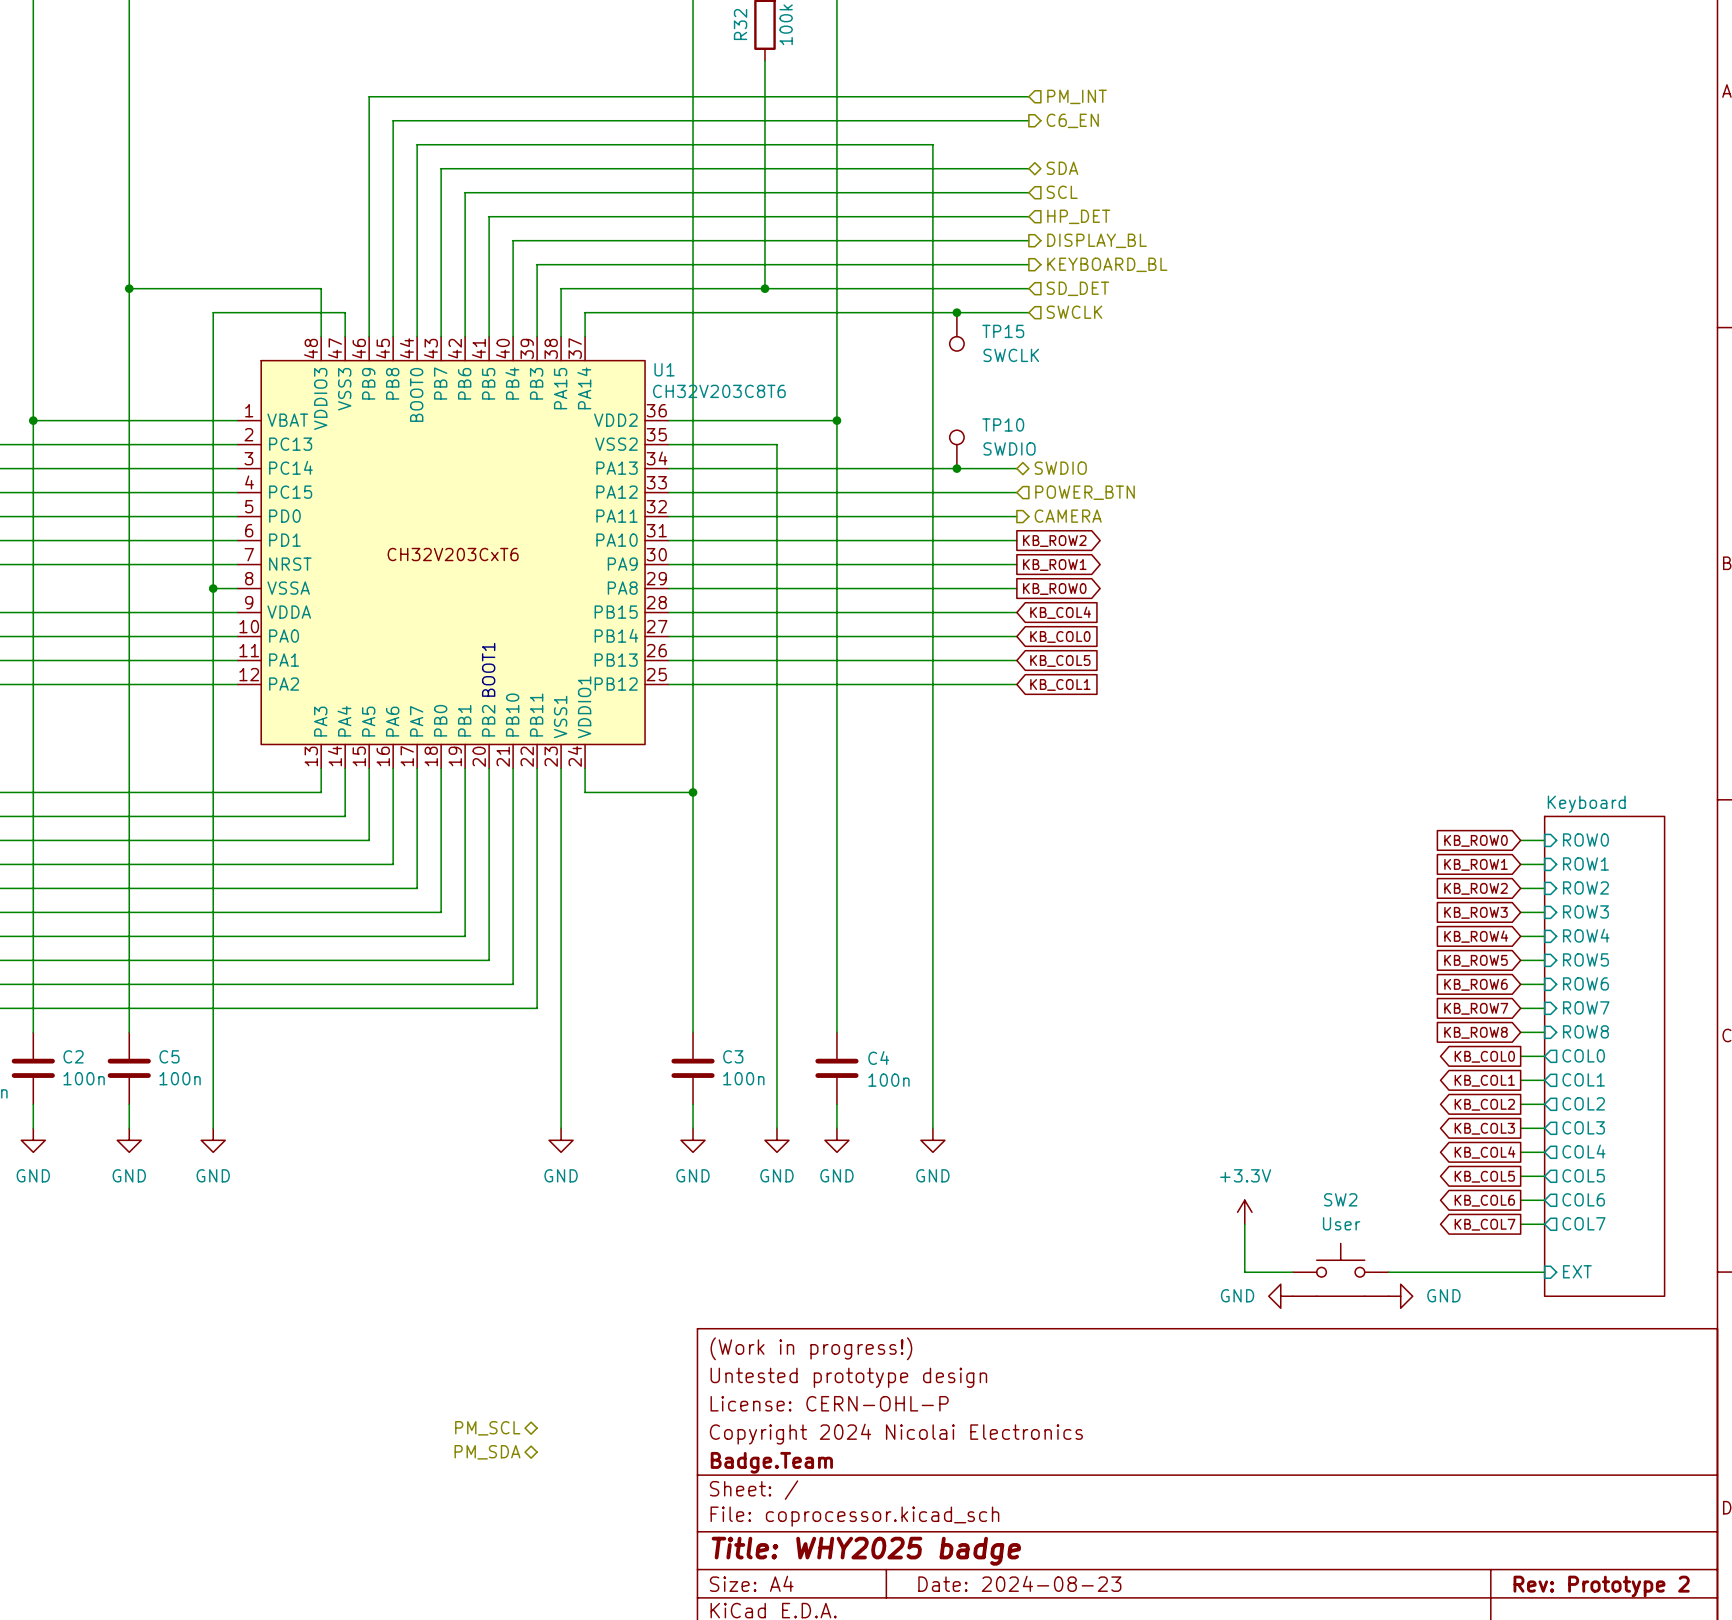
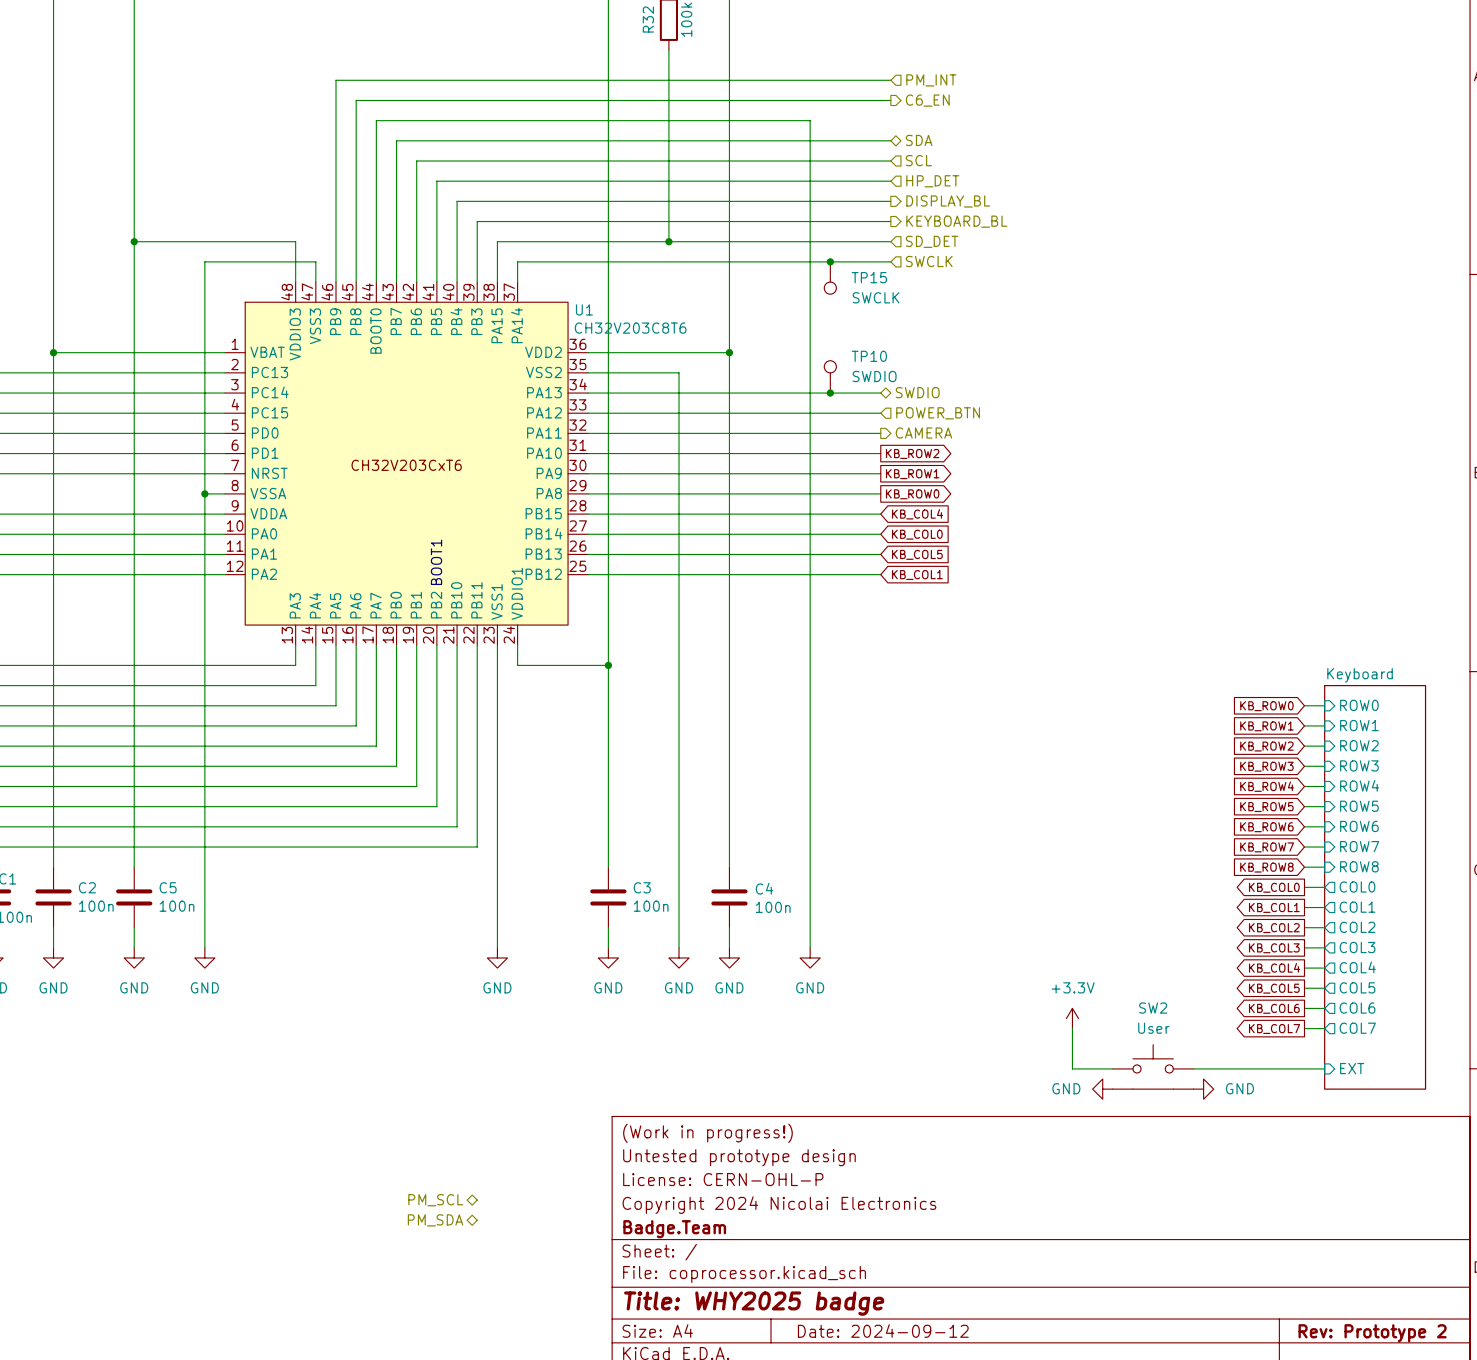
title block: Date: 2024-08-23 (1019, 1583) -> Date: 2024-09-12 (883, 1330)

